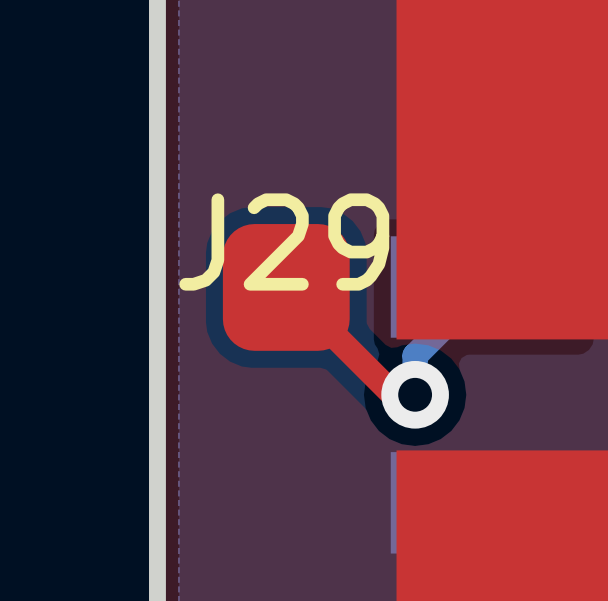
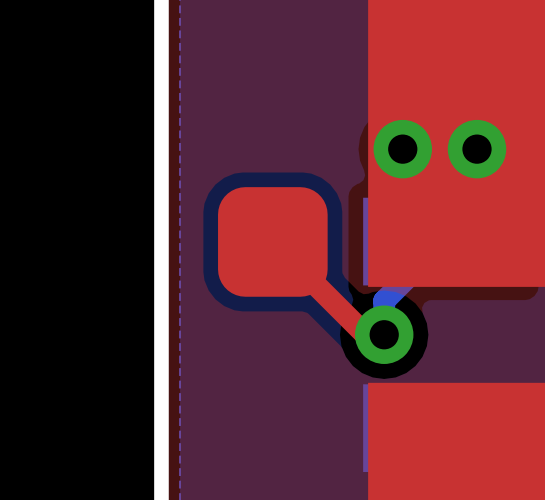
via: none -> (402, 149)
via: none -> (477, 149)
J29 name: J29 (284, 242) -> none

